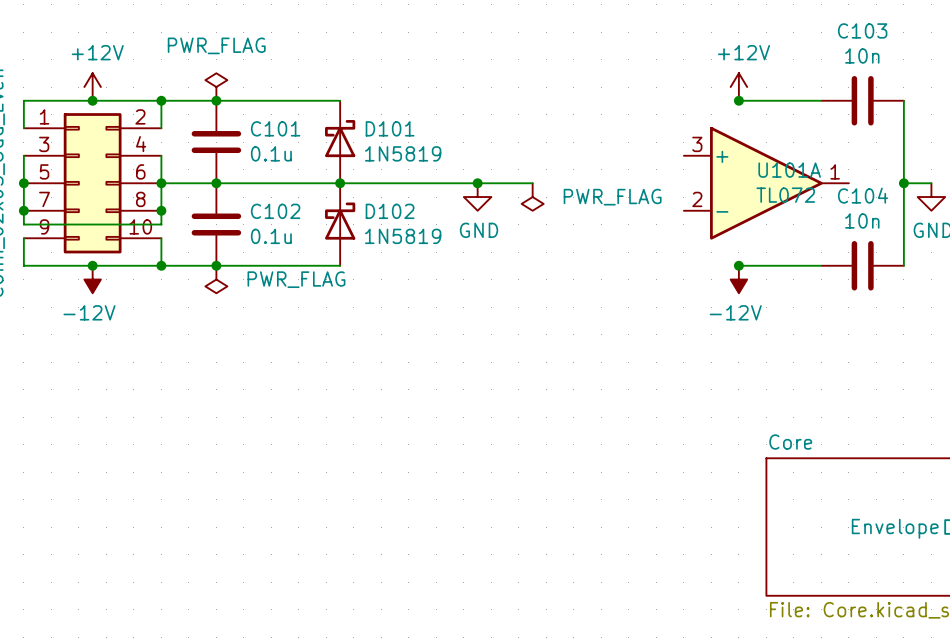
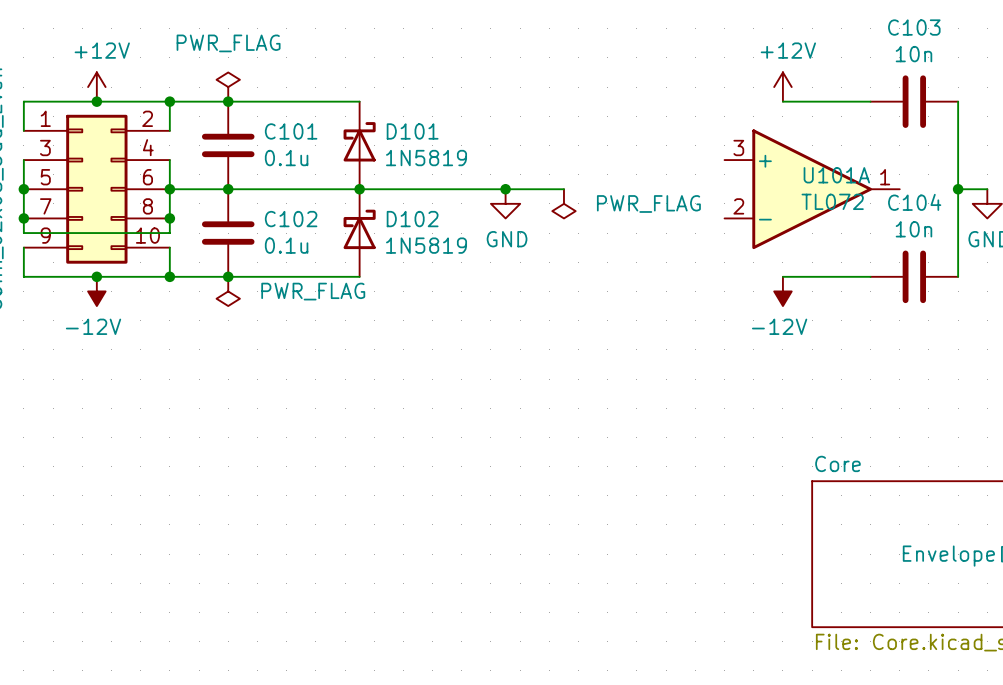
junction: (738, 100) -> none
junction: (738, 265) -> none

